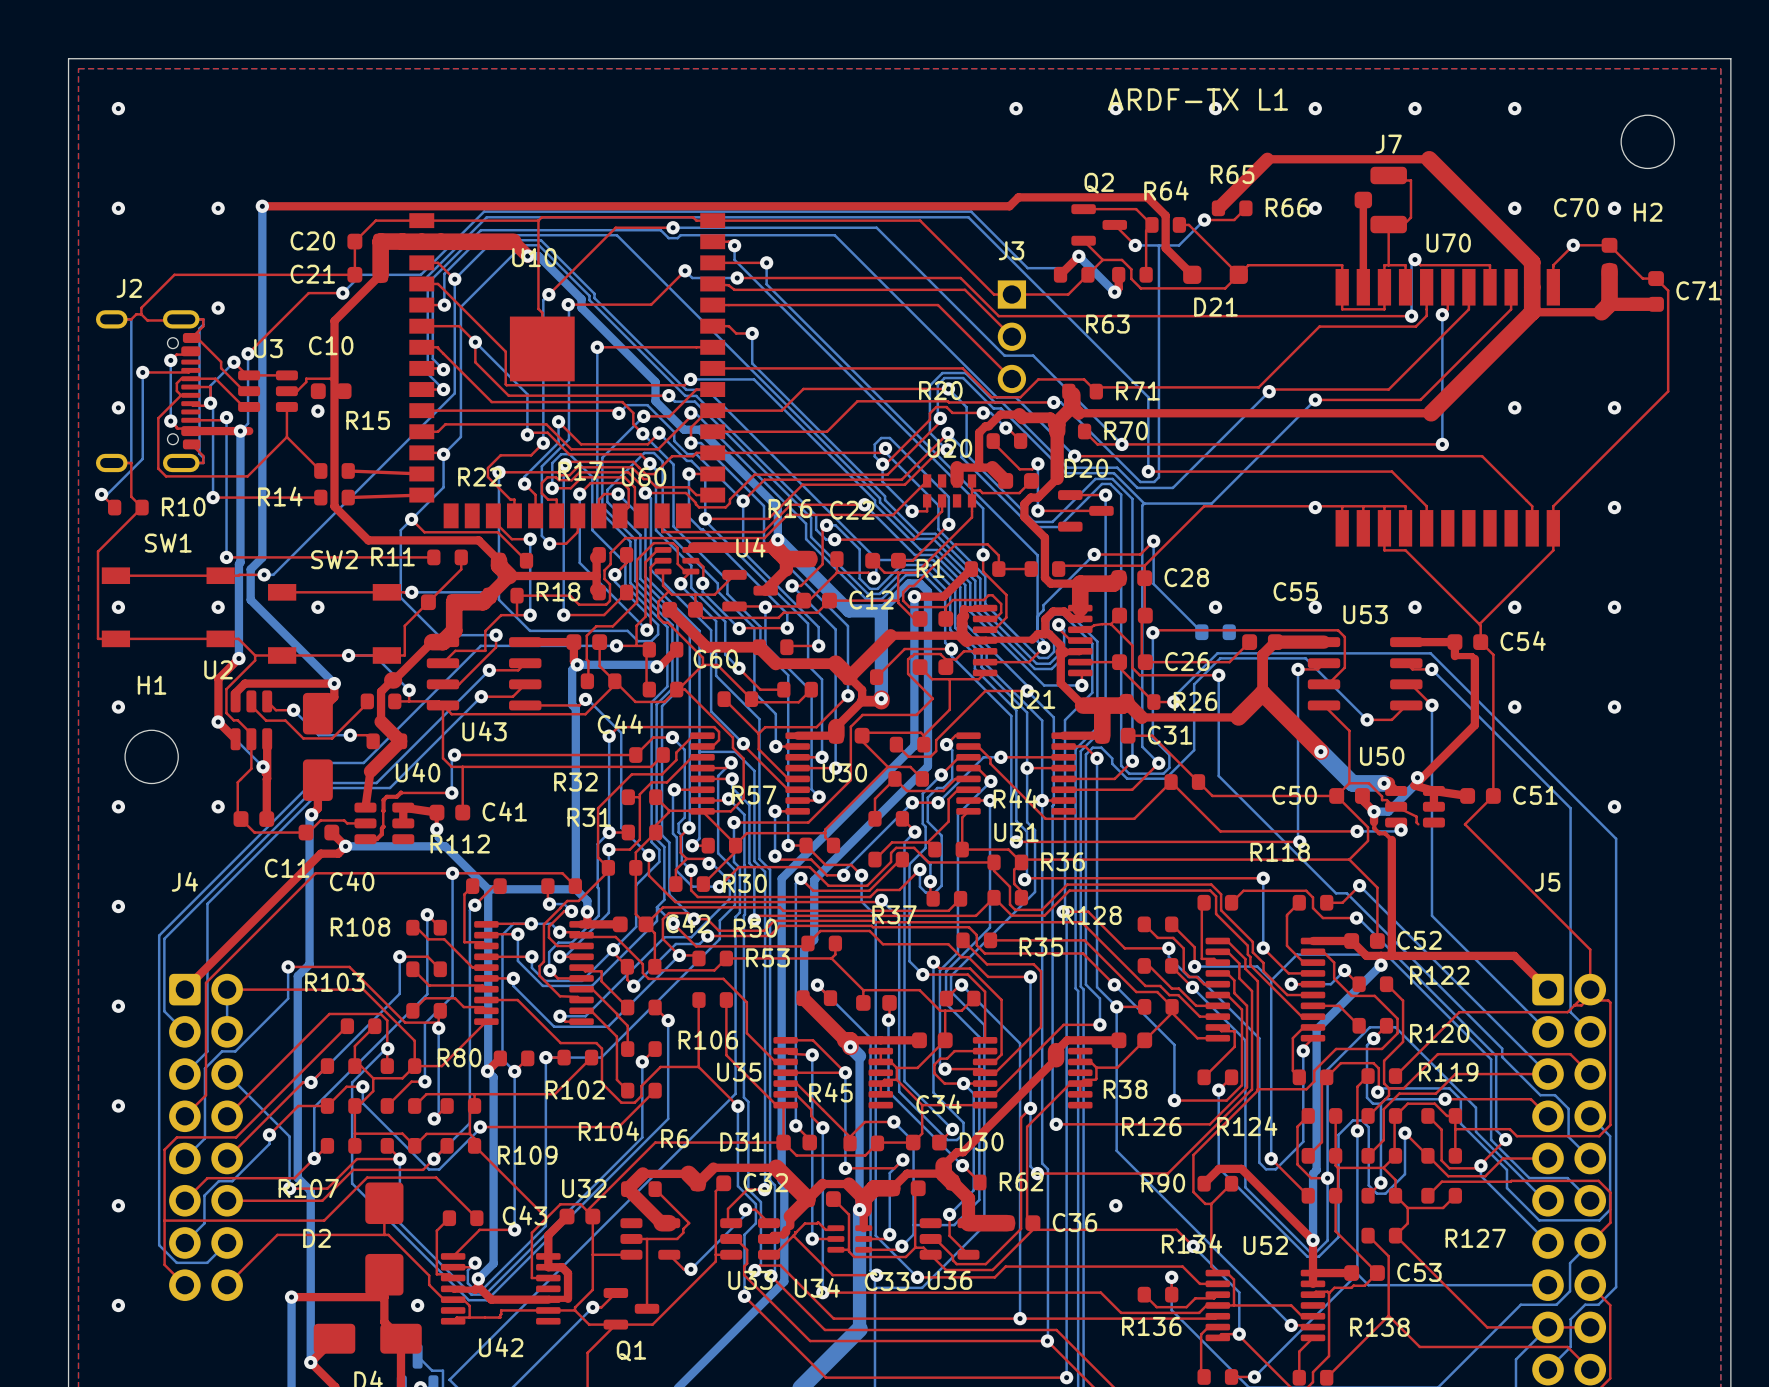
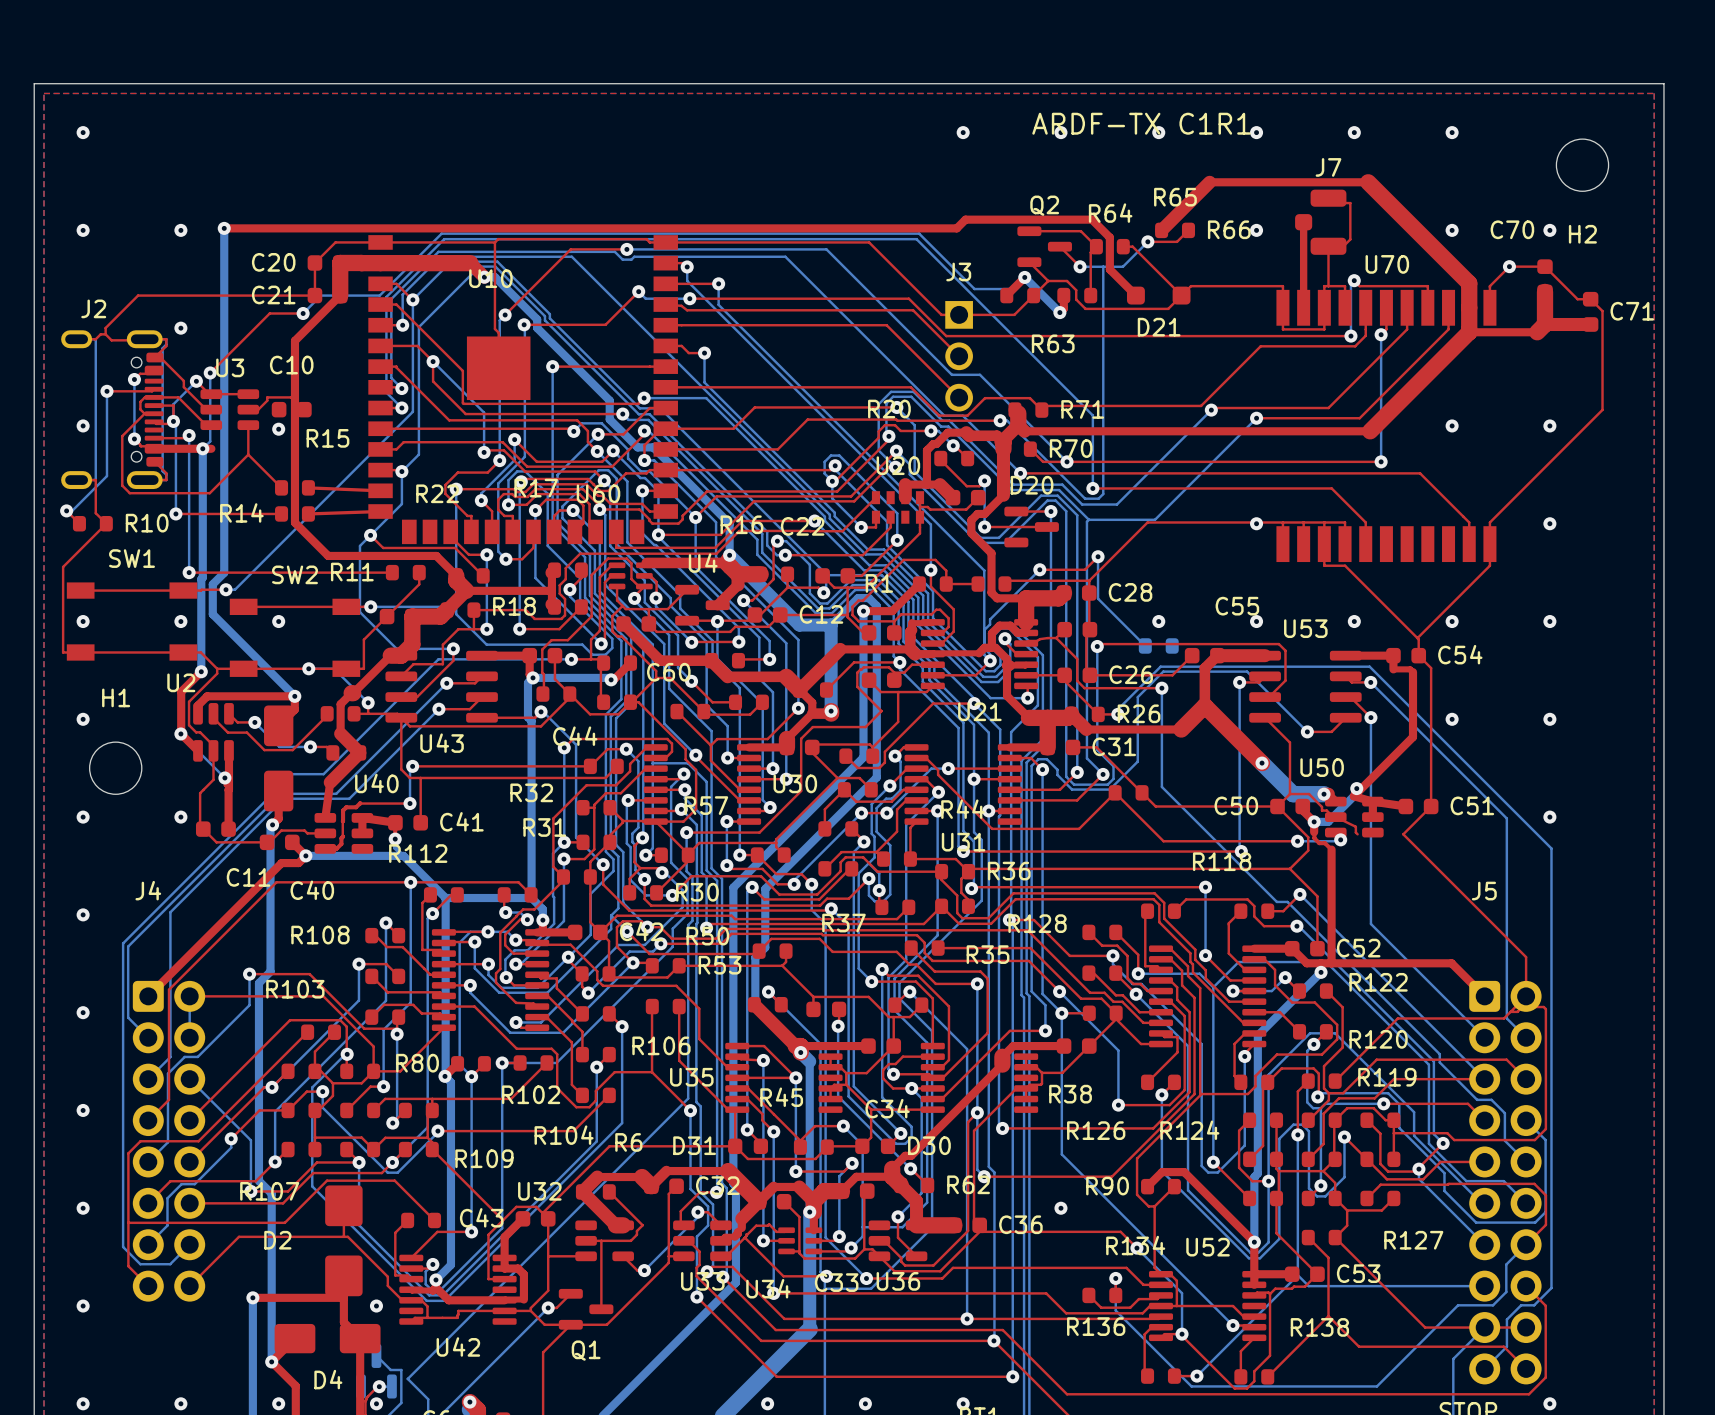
text: ARDF-TX L1 (1197, 99) -> ARDF-TX C1R1 (1141, 123)

